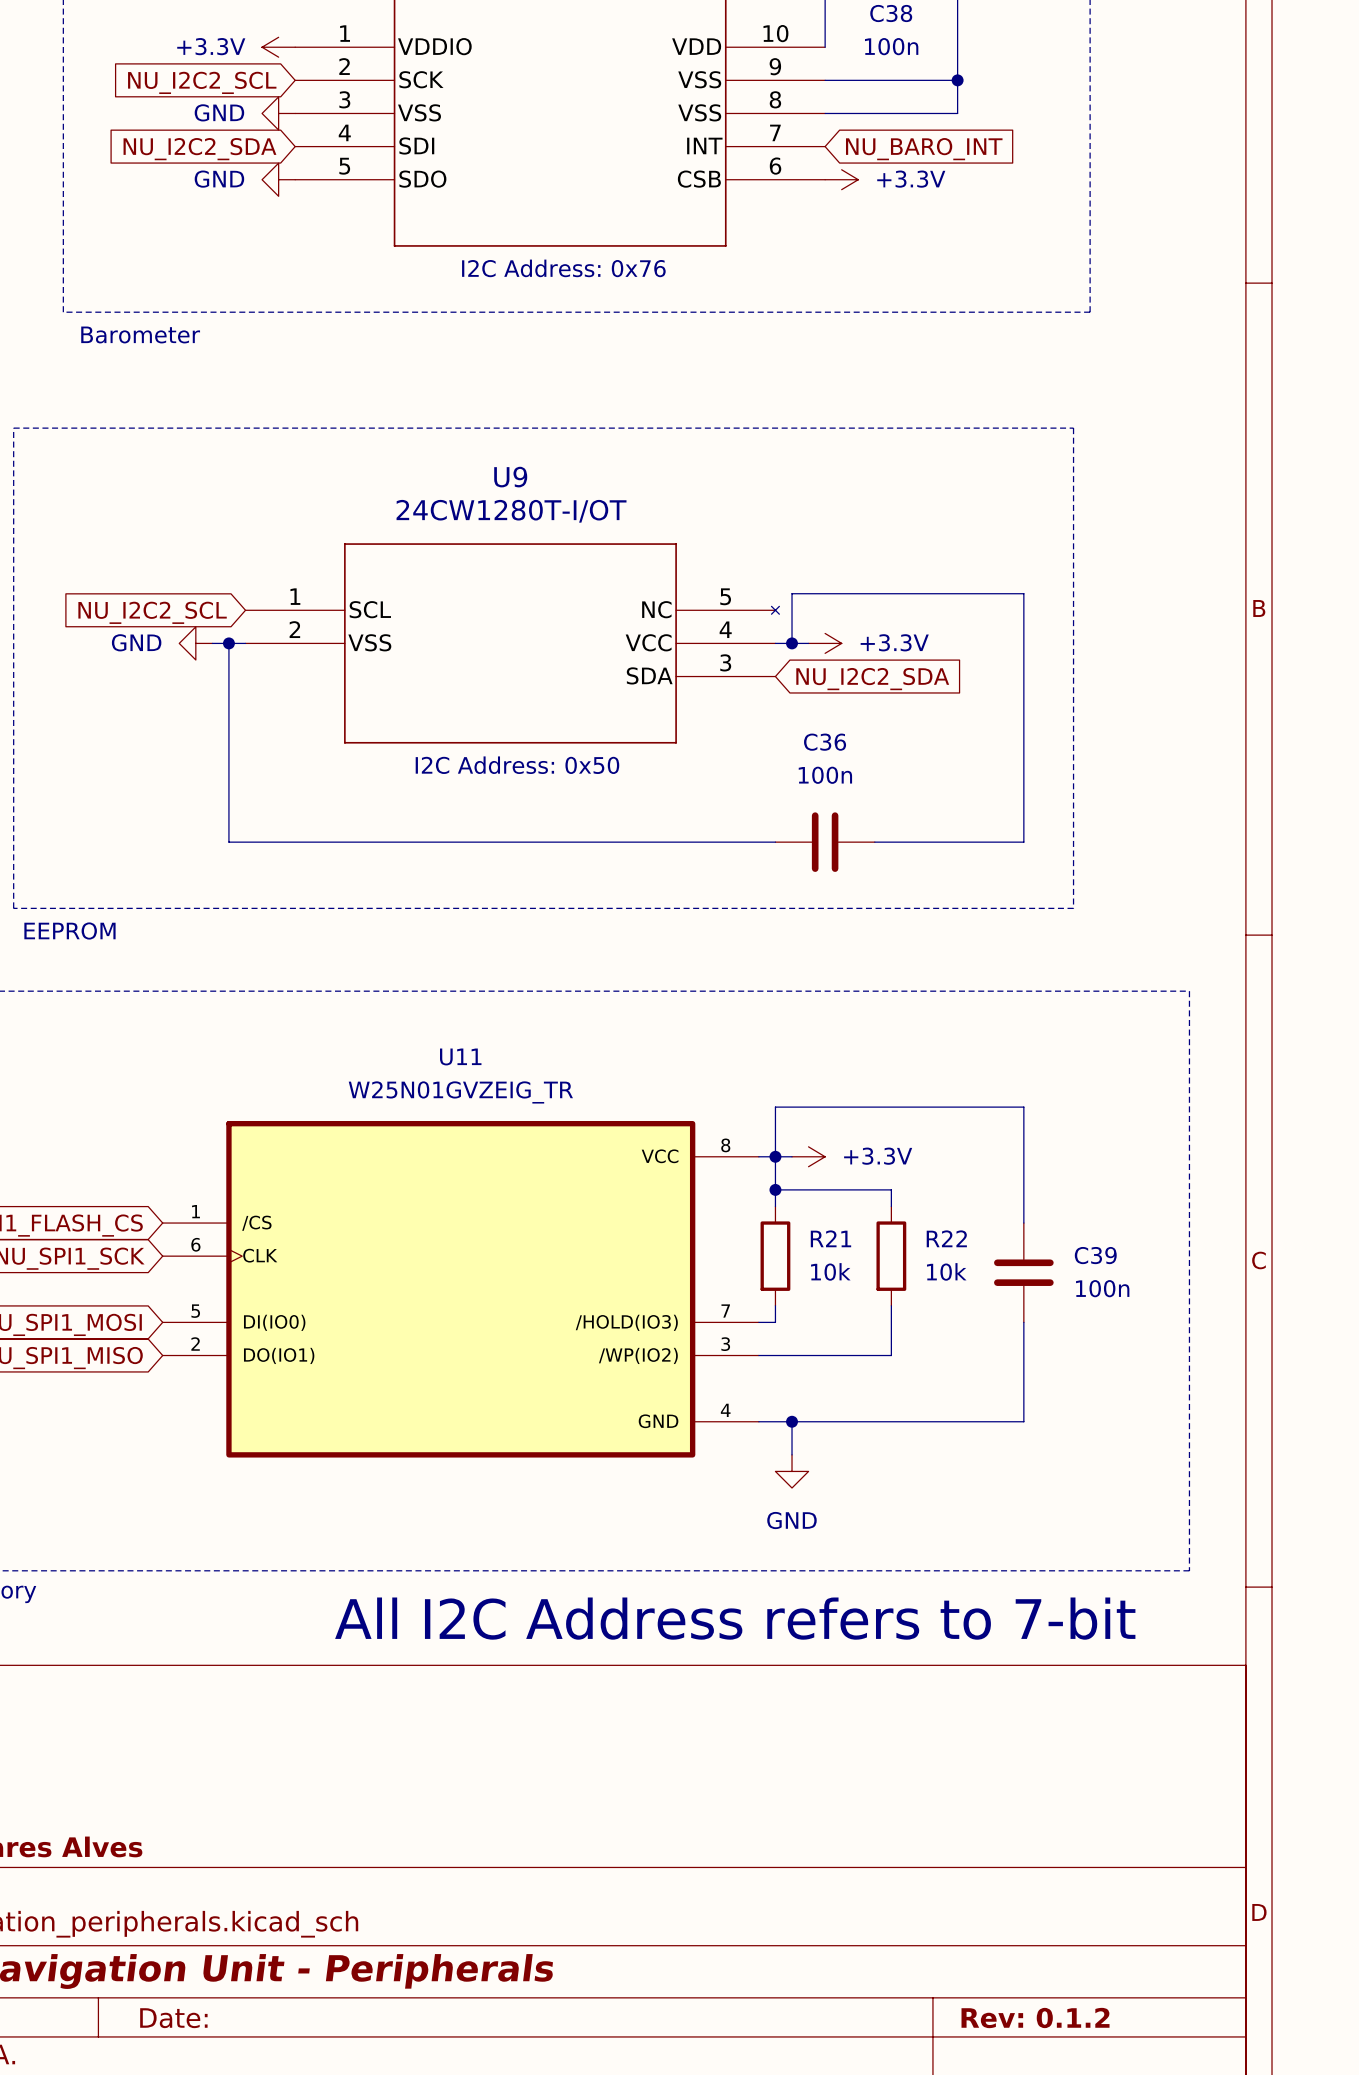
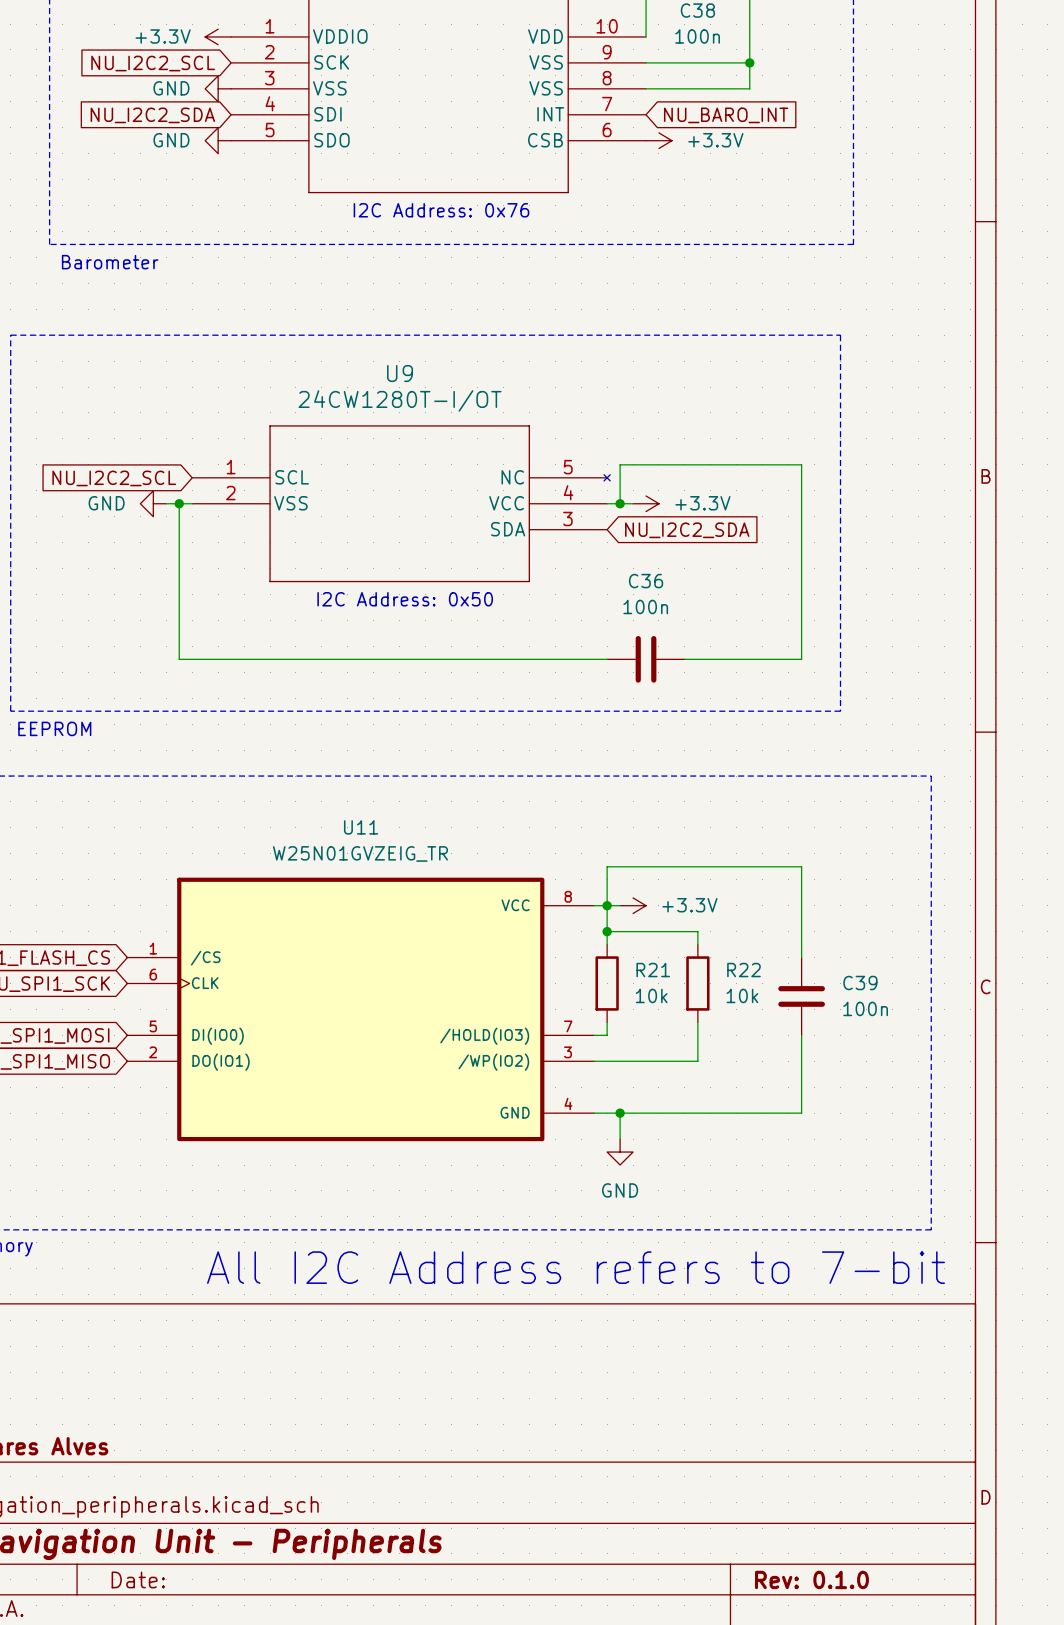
title block: Rev: 0.1.2 (1035, 2018) -> Rev: 0.1.0 (811, 1579)

